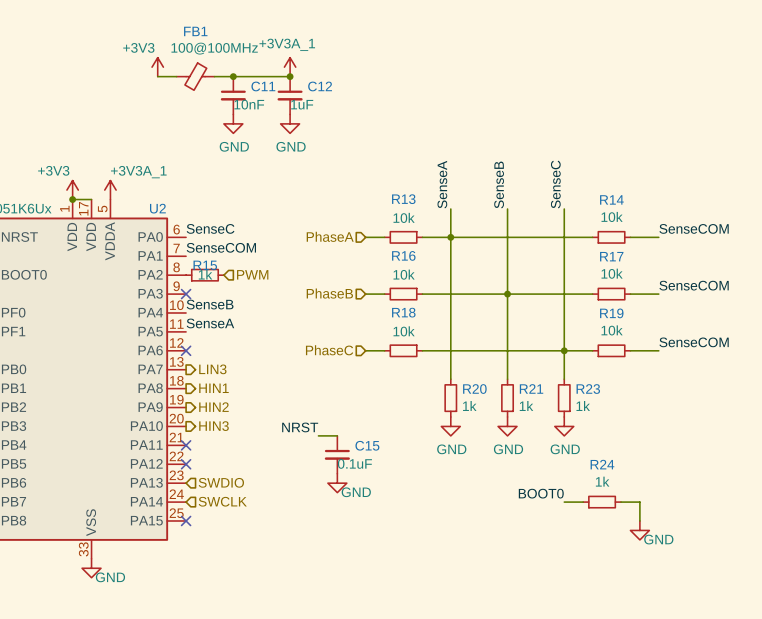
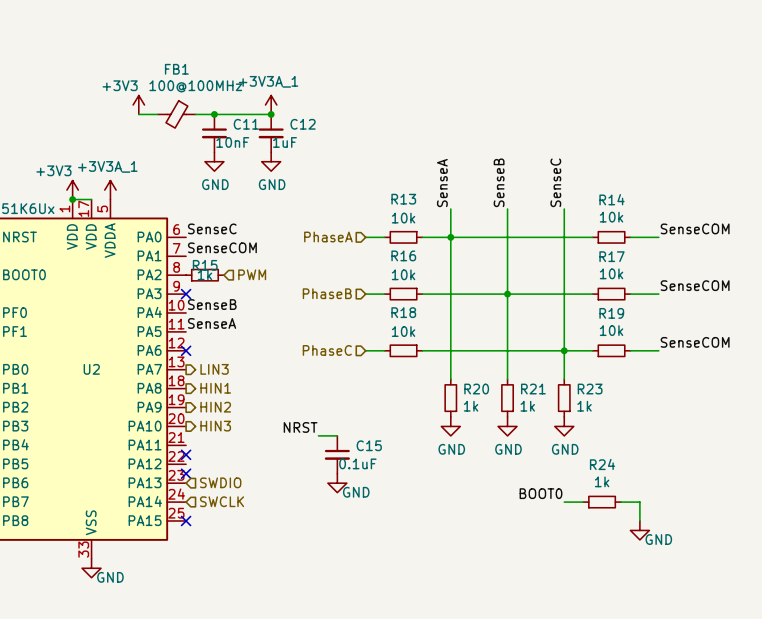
power symbol position: +3V3 (157, 67) -> +3V3 (138, 104)
power symbol position: +3V3A_1 (290, 67) -> +3V3A_1 (271, 104)
wire: (157, 76) (176, 76) -> (138, 114) (157, 114)
FB1 position: (195, 76) -> (176, 114)
wire: (214, 76) (290, 76) -> (195, 114) (271, 114)
junction: (233, 76) -> none
junction: (290, 76) -> none
C11 position: (233, 95) -> (214, 133)
C12 position: (290, 95) -> (271, 133)
junction: none -> (214, 114)
junction: none -> (271, 114)
power symbol: GND (233, 123) -> none
power symbol: GND (290, 123) -> none
power symbol: none -> GND (214, 161)
power symbol: none -> GND (271, 161)
power symbol text position: +3V3A_1 (138, 172) -> +3V3A_1 (107, 166)
U2 name position: U2 (157, 208) -> U2 (91, 369)
no-connect mark: (186, 445) -> none
no-connect mark: none -> (186, 454)
no-connect mark: (186, 464) -> none
no-connect mark: none -> (186, 473)

